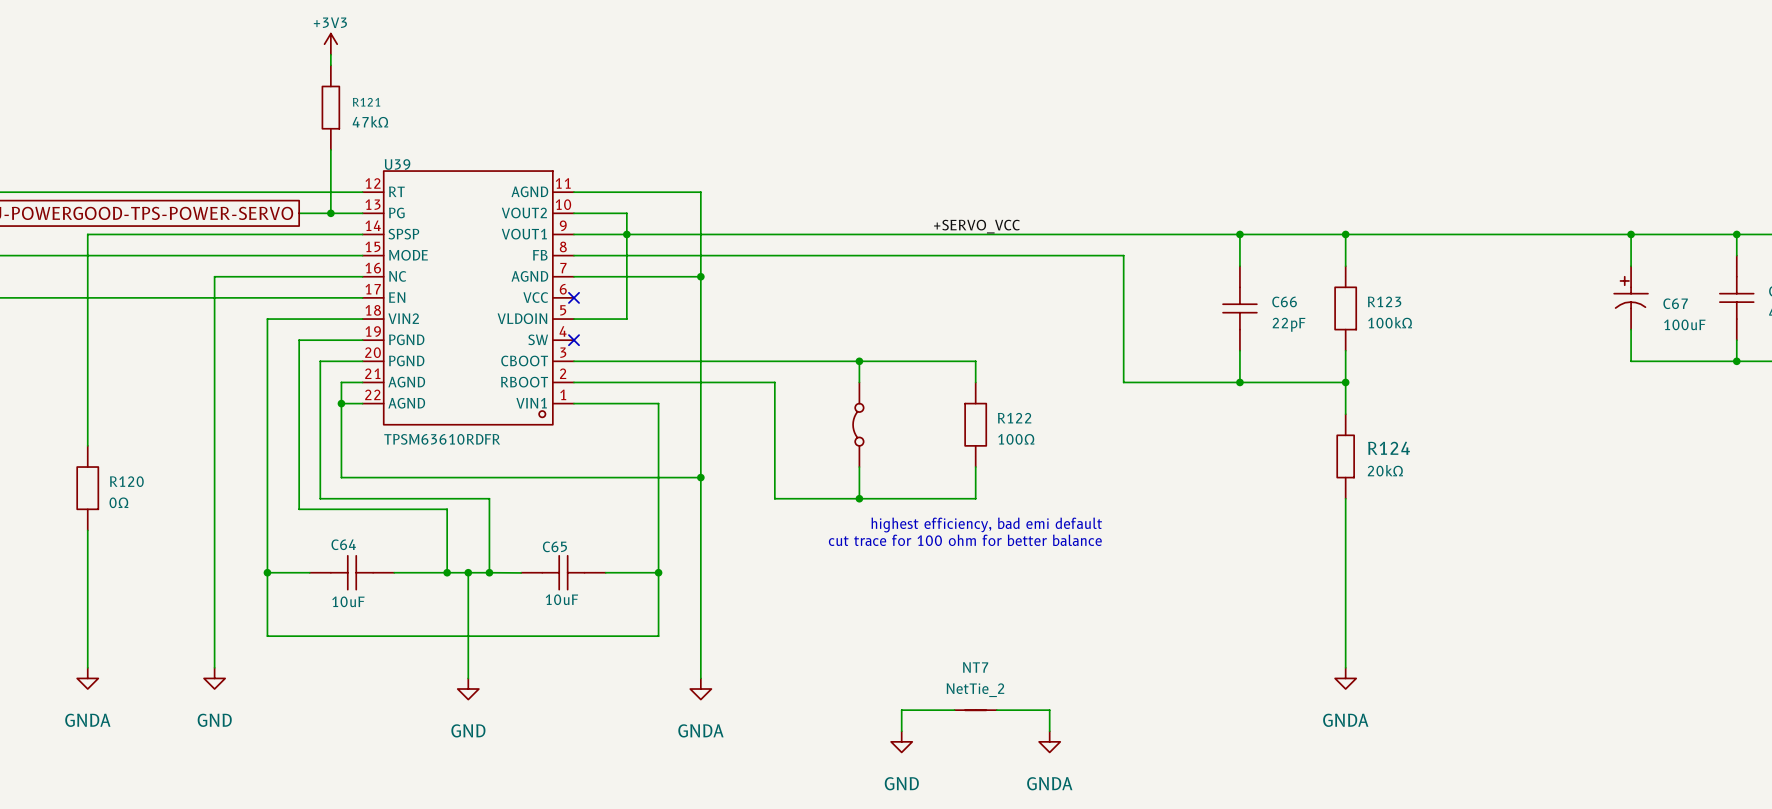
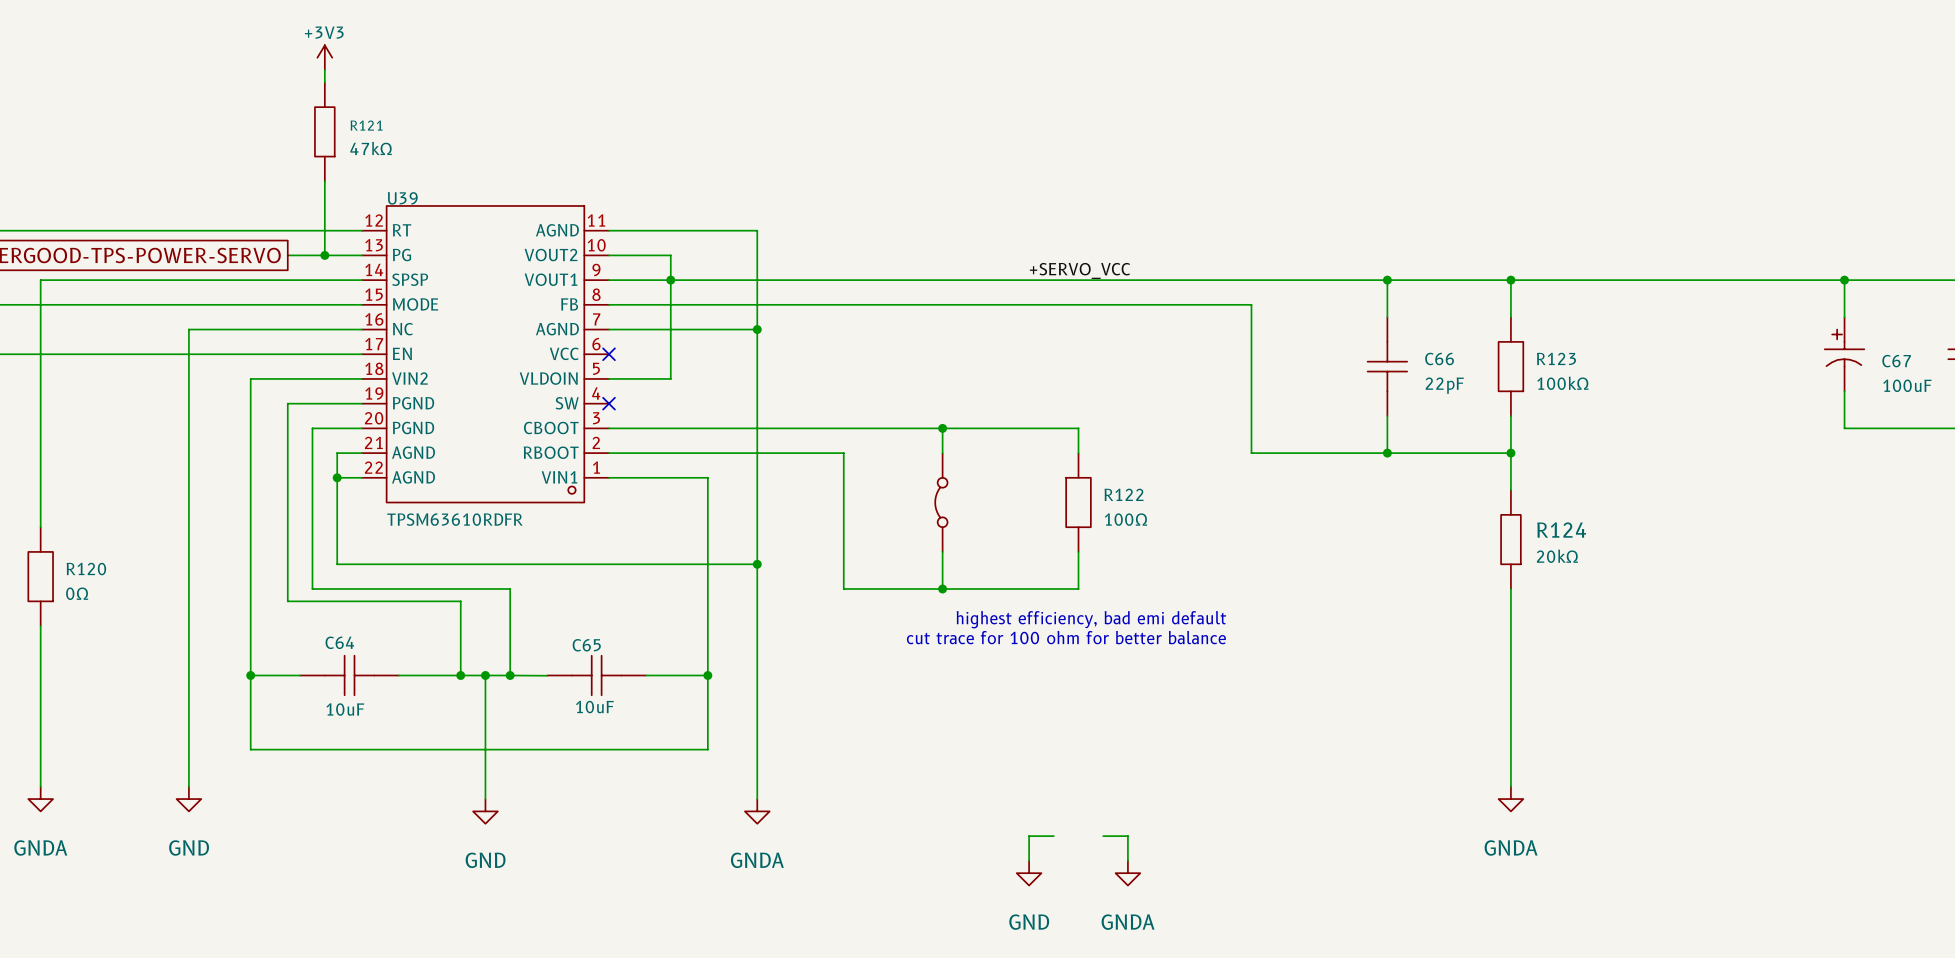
wire: (933, 710) (901, 710) (901, 731) -> (1029, 836) (1029, 860)
NT7: NetTie_2 (975, 710) -> none
wire: (1017, 710) (1049, 710) (1049, 731) -> (1127, 836) (1127, 860)
power symbol position: GND (901, 741) -> GND (1029, 873)
power symbol position: GNDA (1049, 741) -> GNDA (1127, 873)

